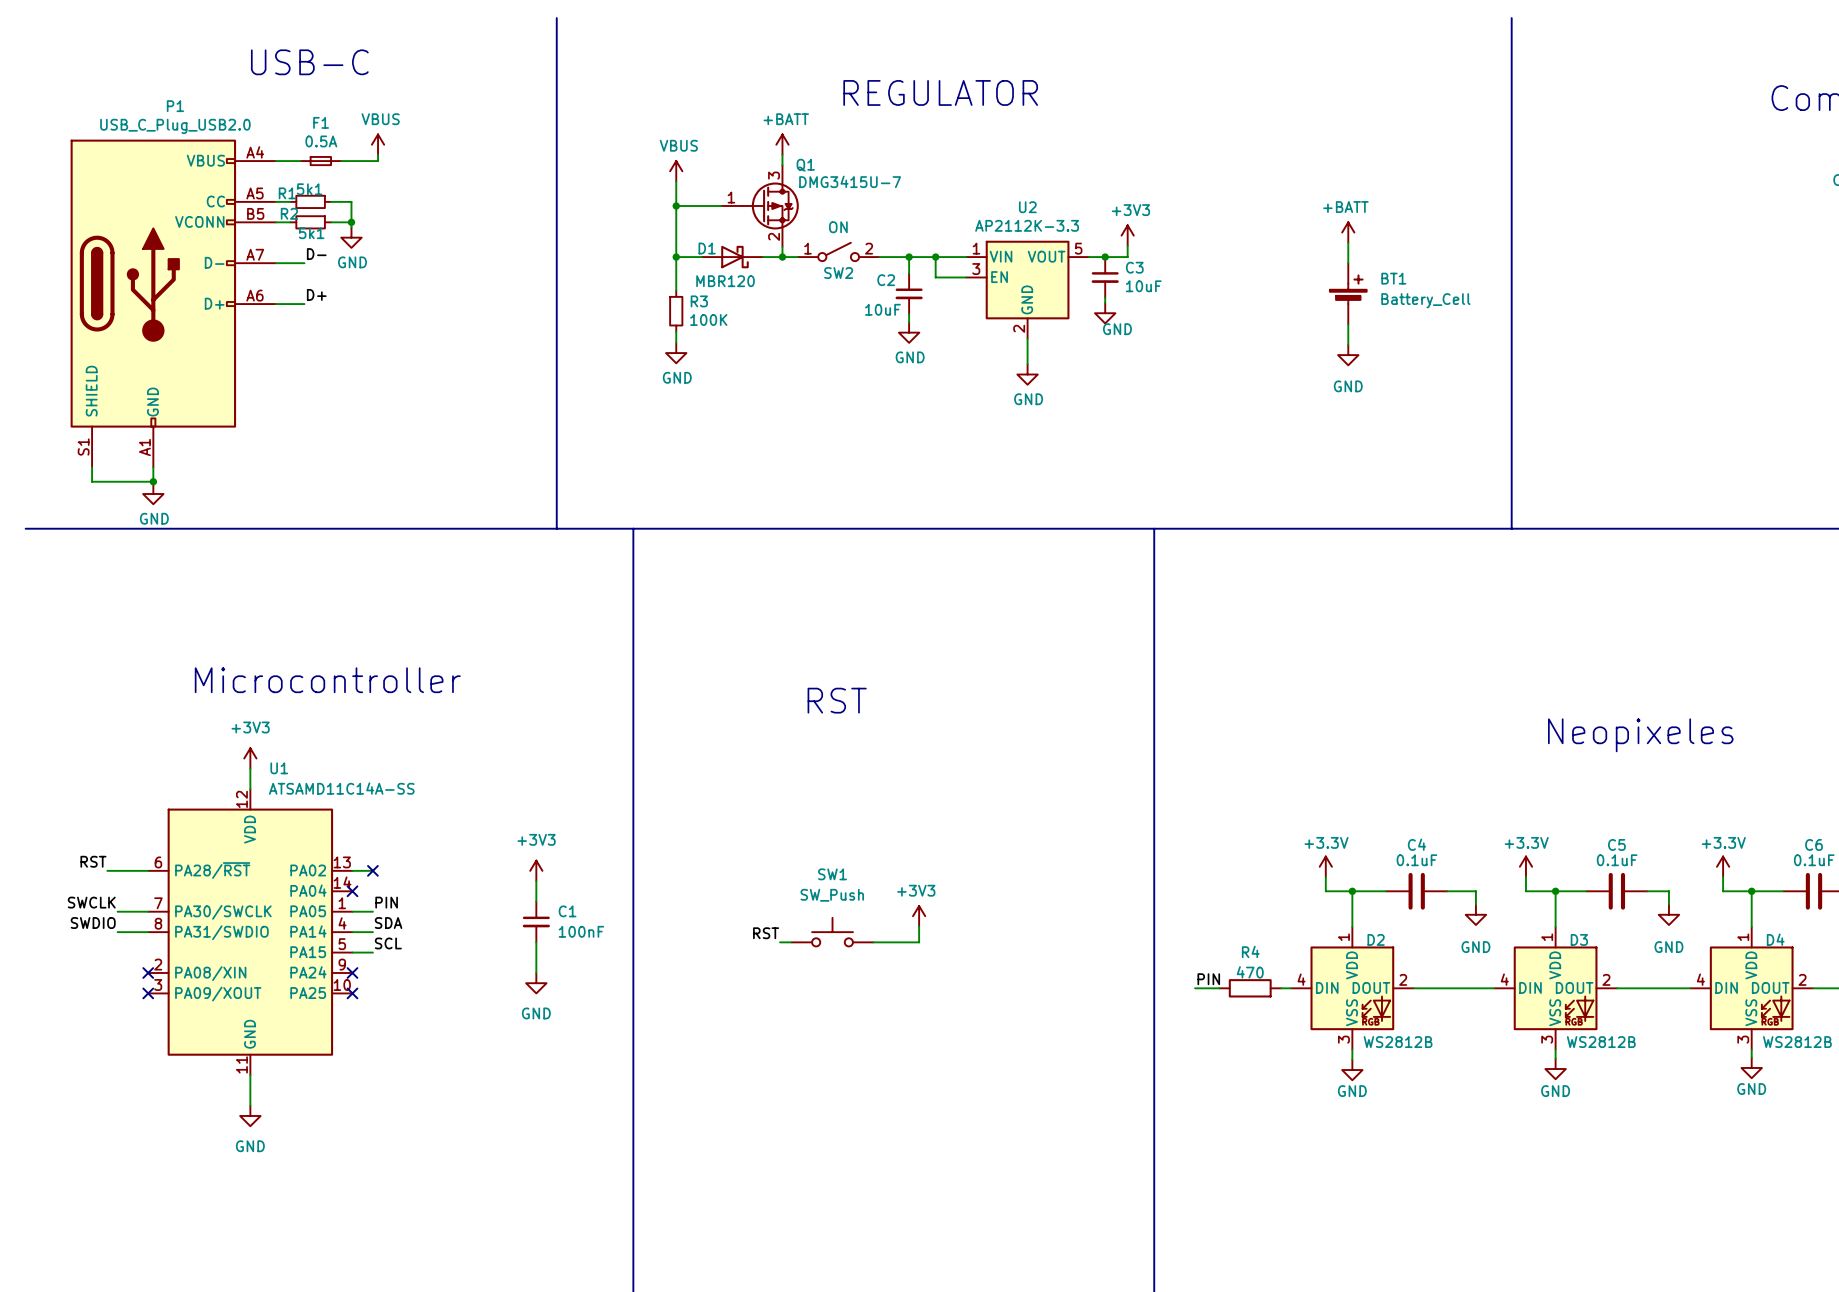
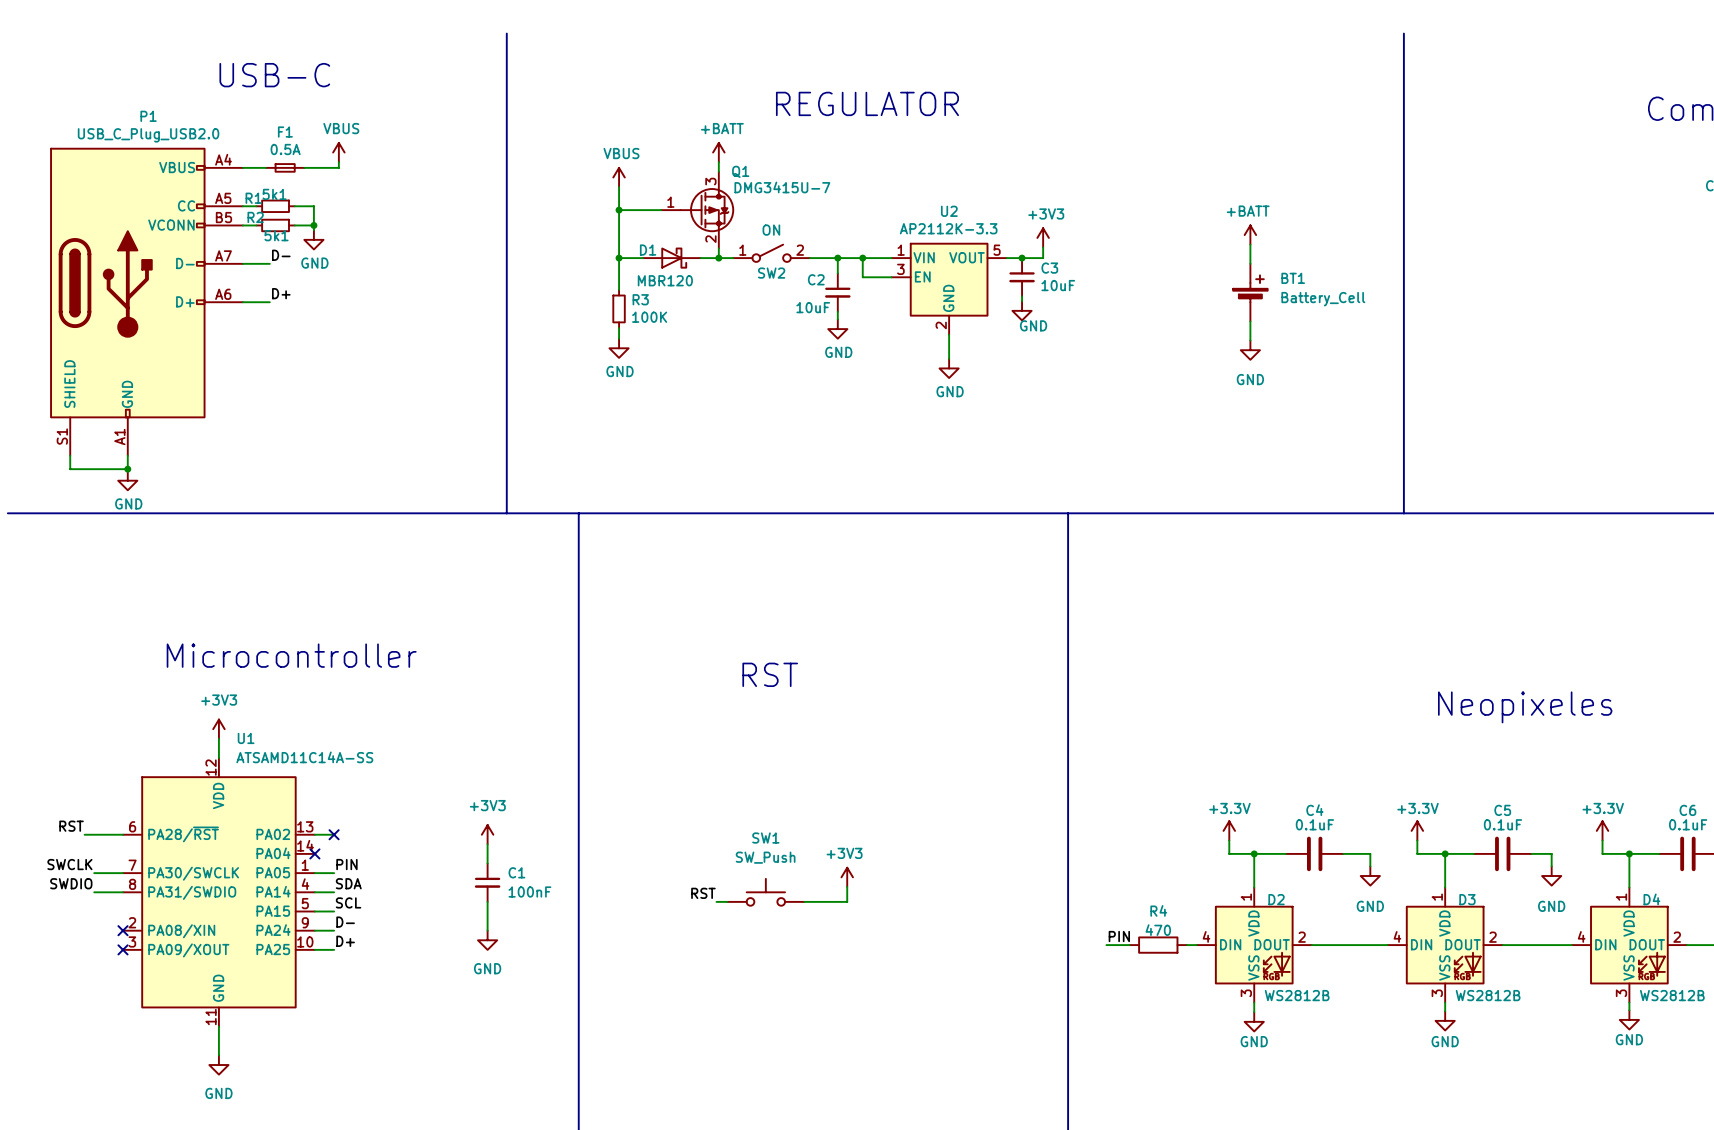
label: none -> D- (345, 922)
wire: none -> (314, 930) (334, 930)
no-connect mark: (352, 973) -> none
label: none -> D+ (345, 941)
wire: none -> (314, 949) (334, 949)
no-connect mark: (352, 993) -> none

